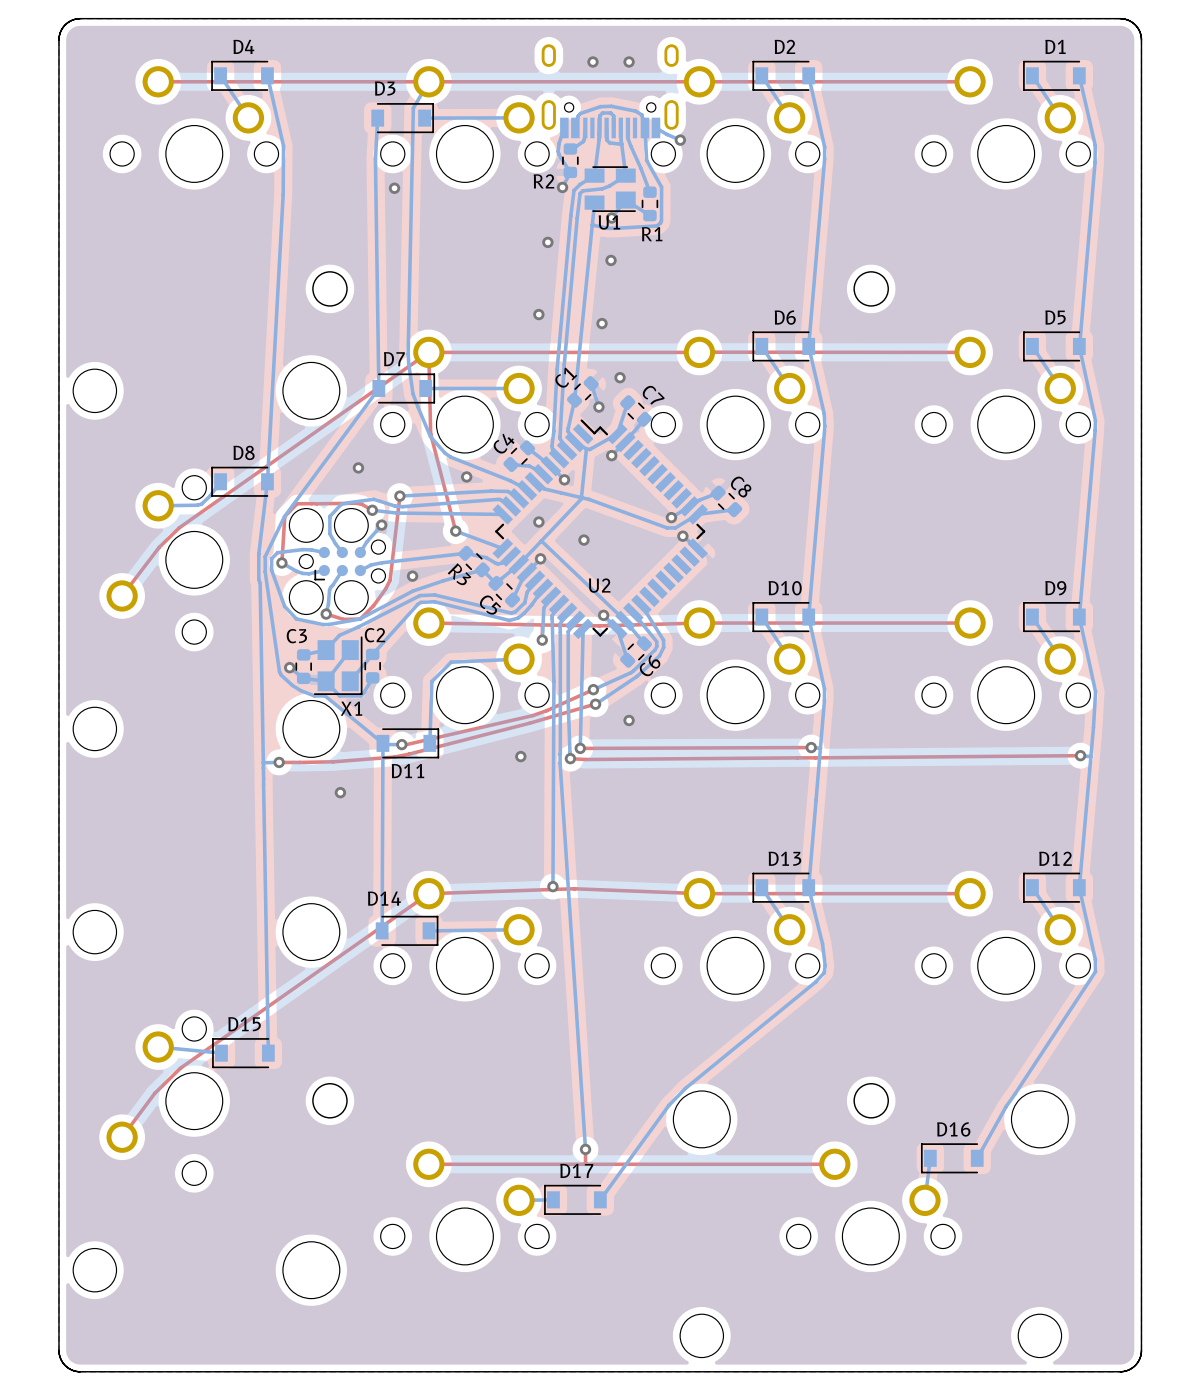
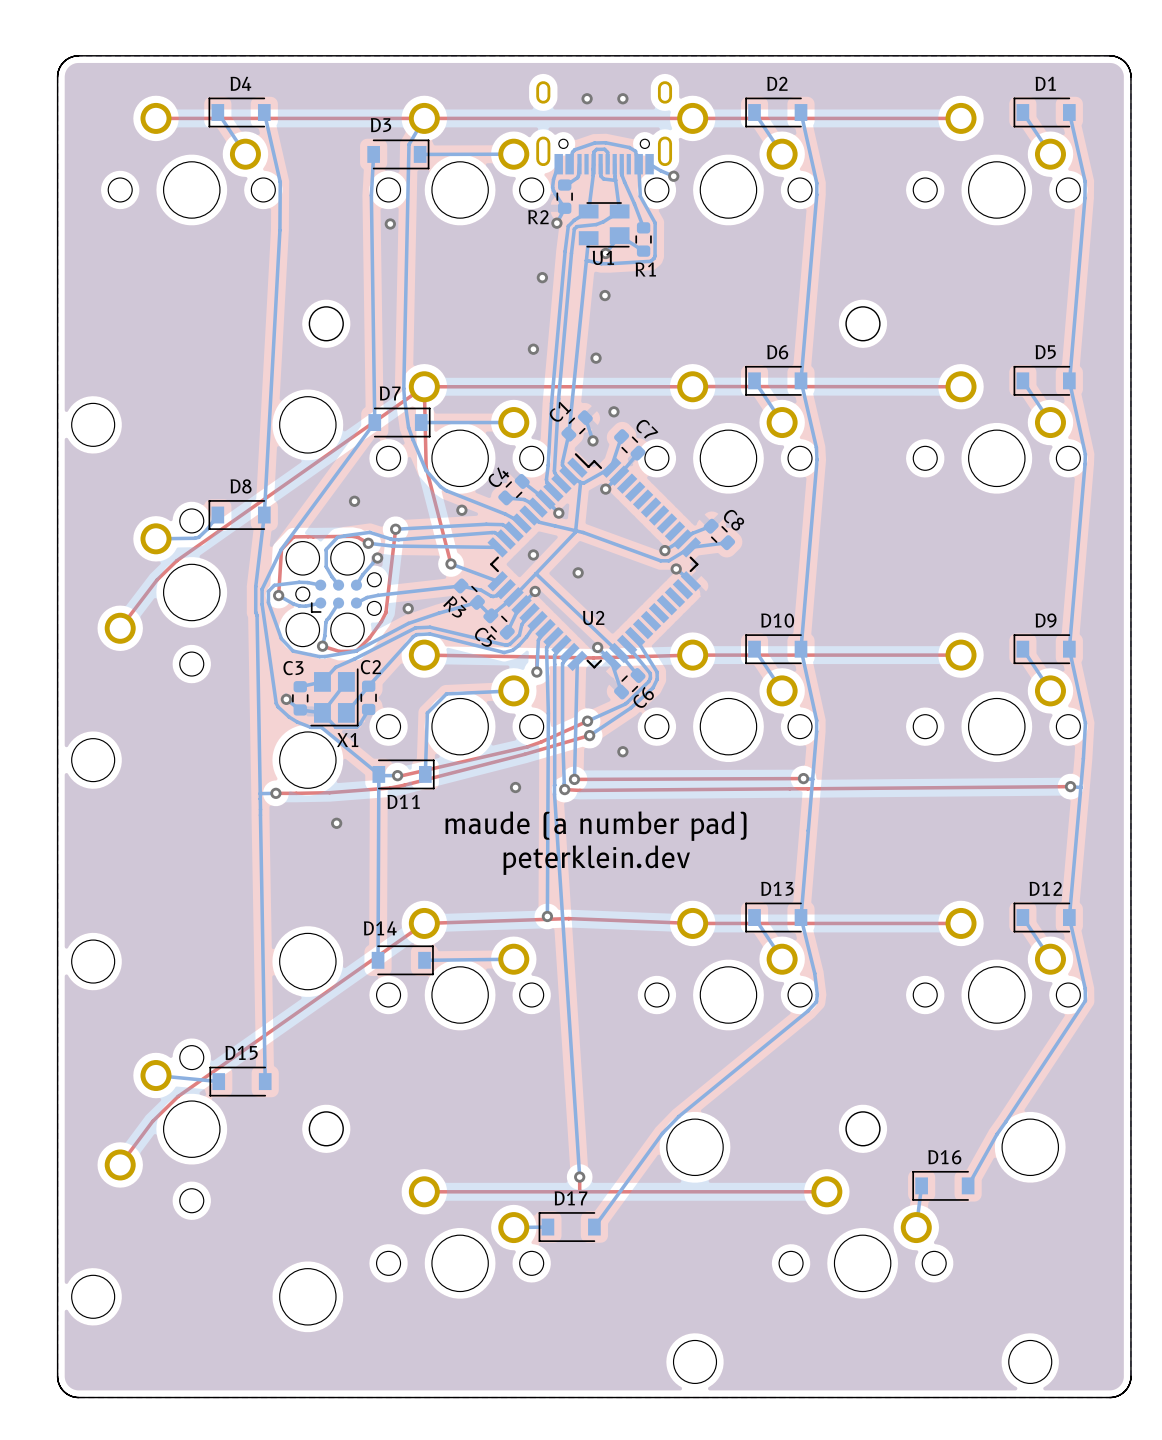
text: none -> maude (a number pad) (596, 826)
text: none -> peterklein.dev (596, 860)

